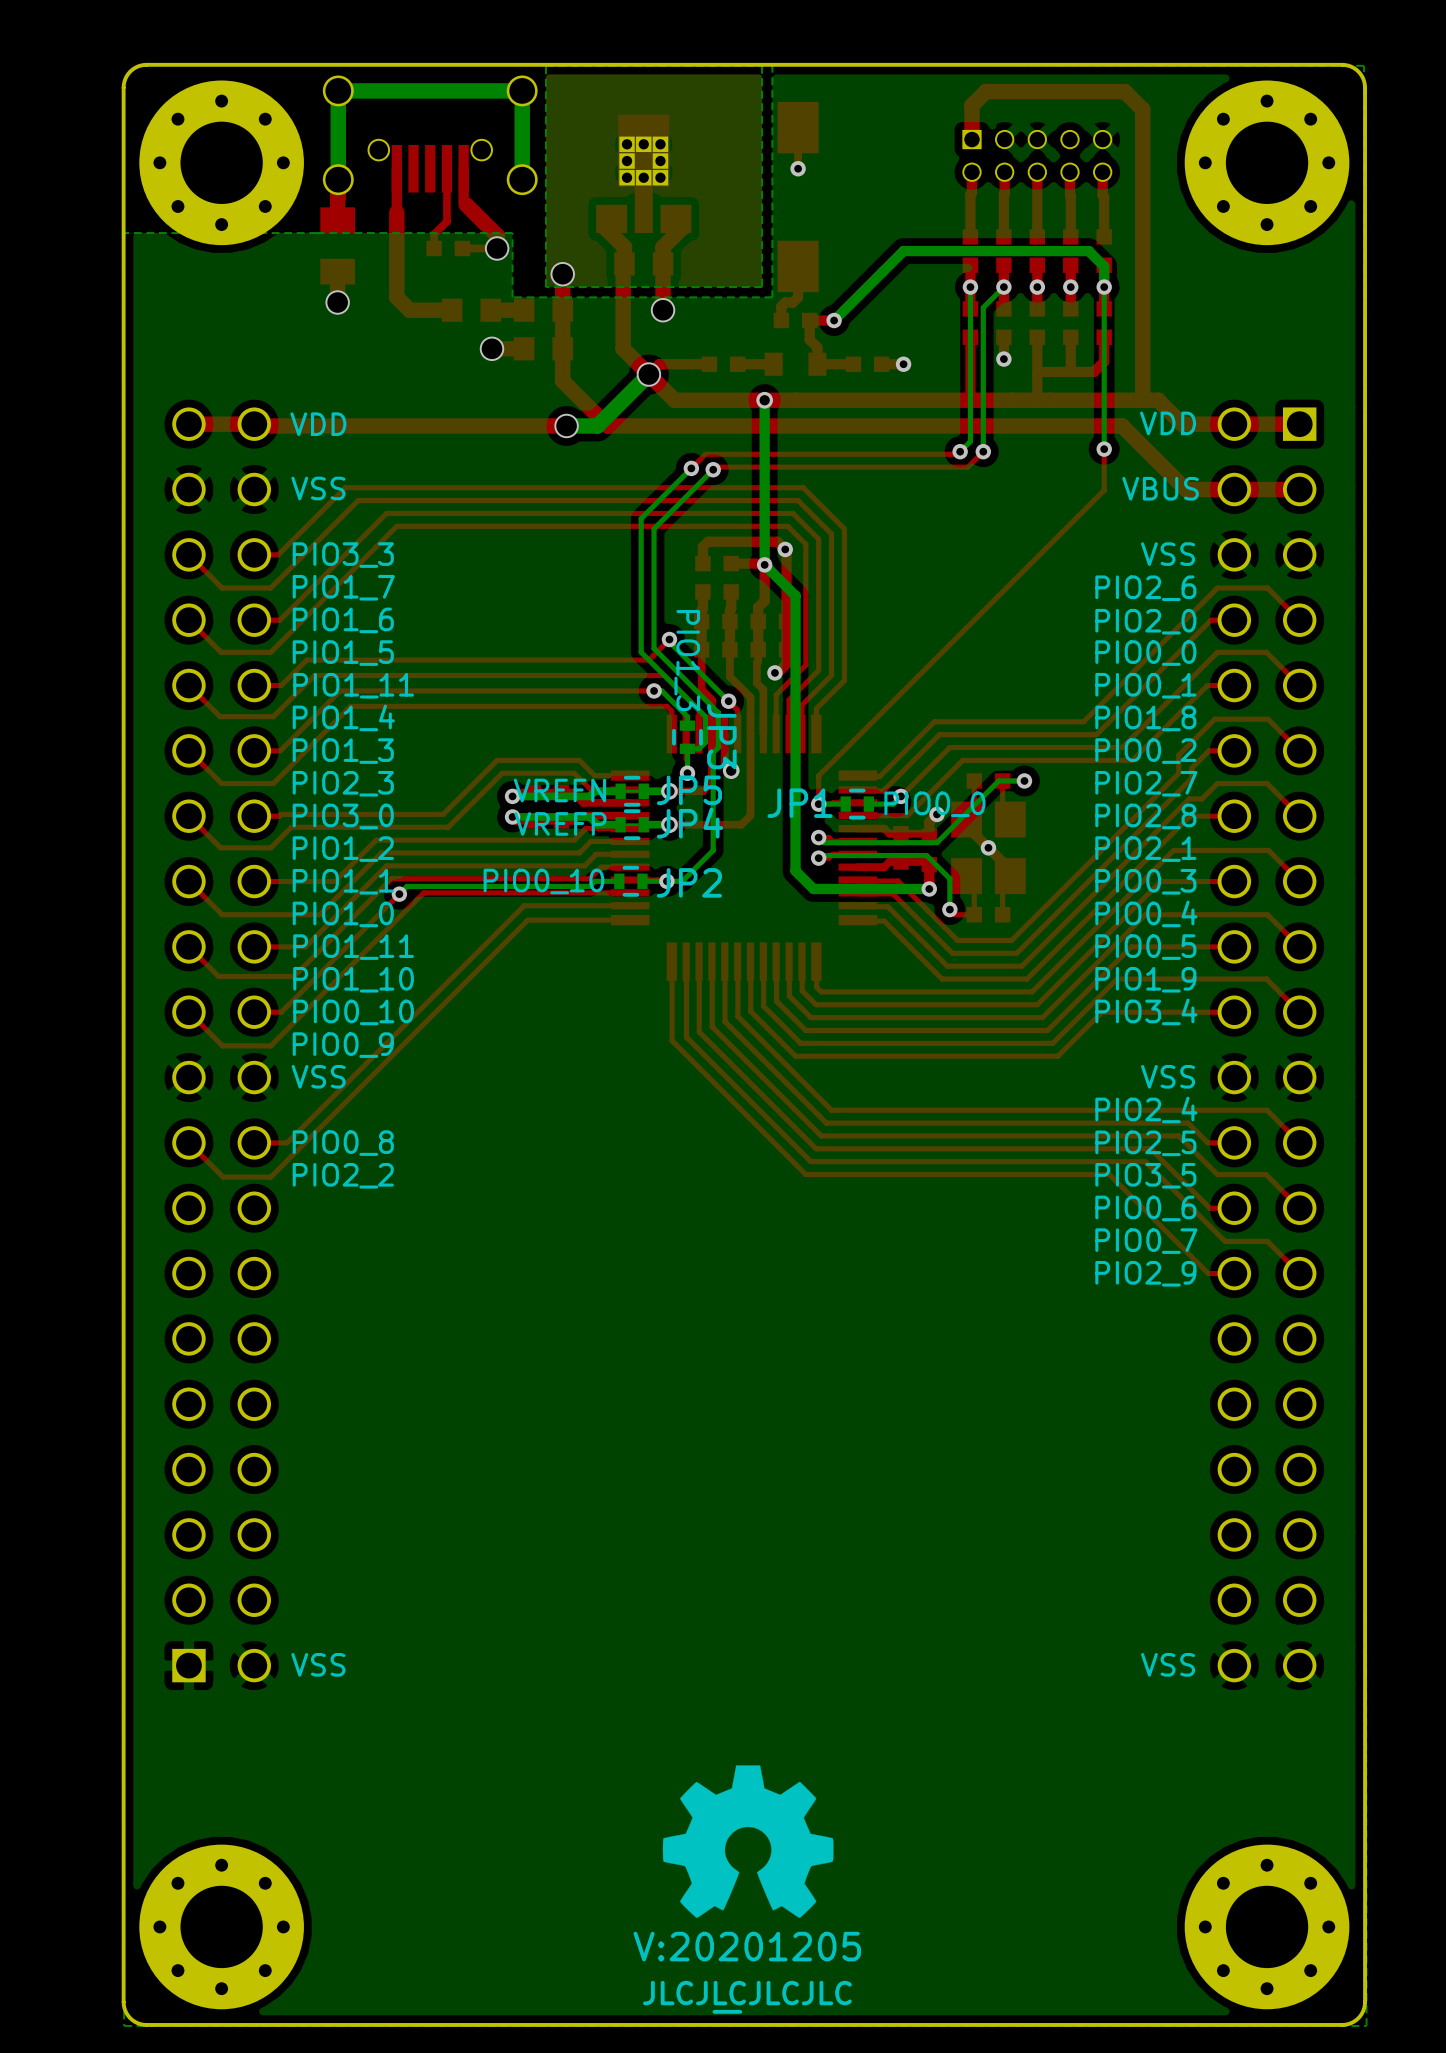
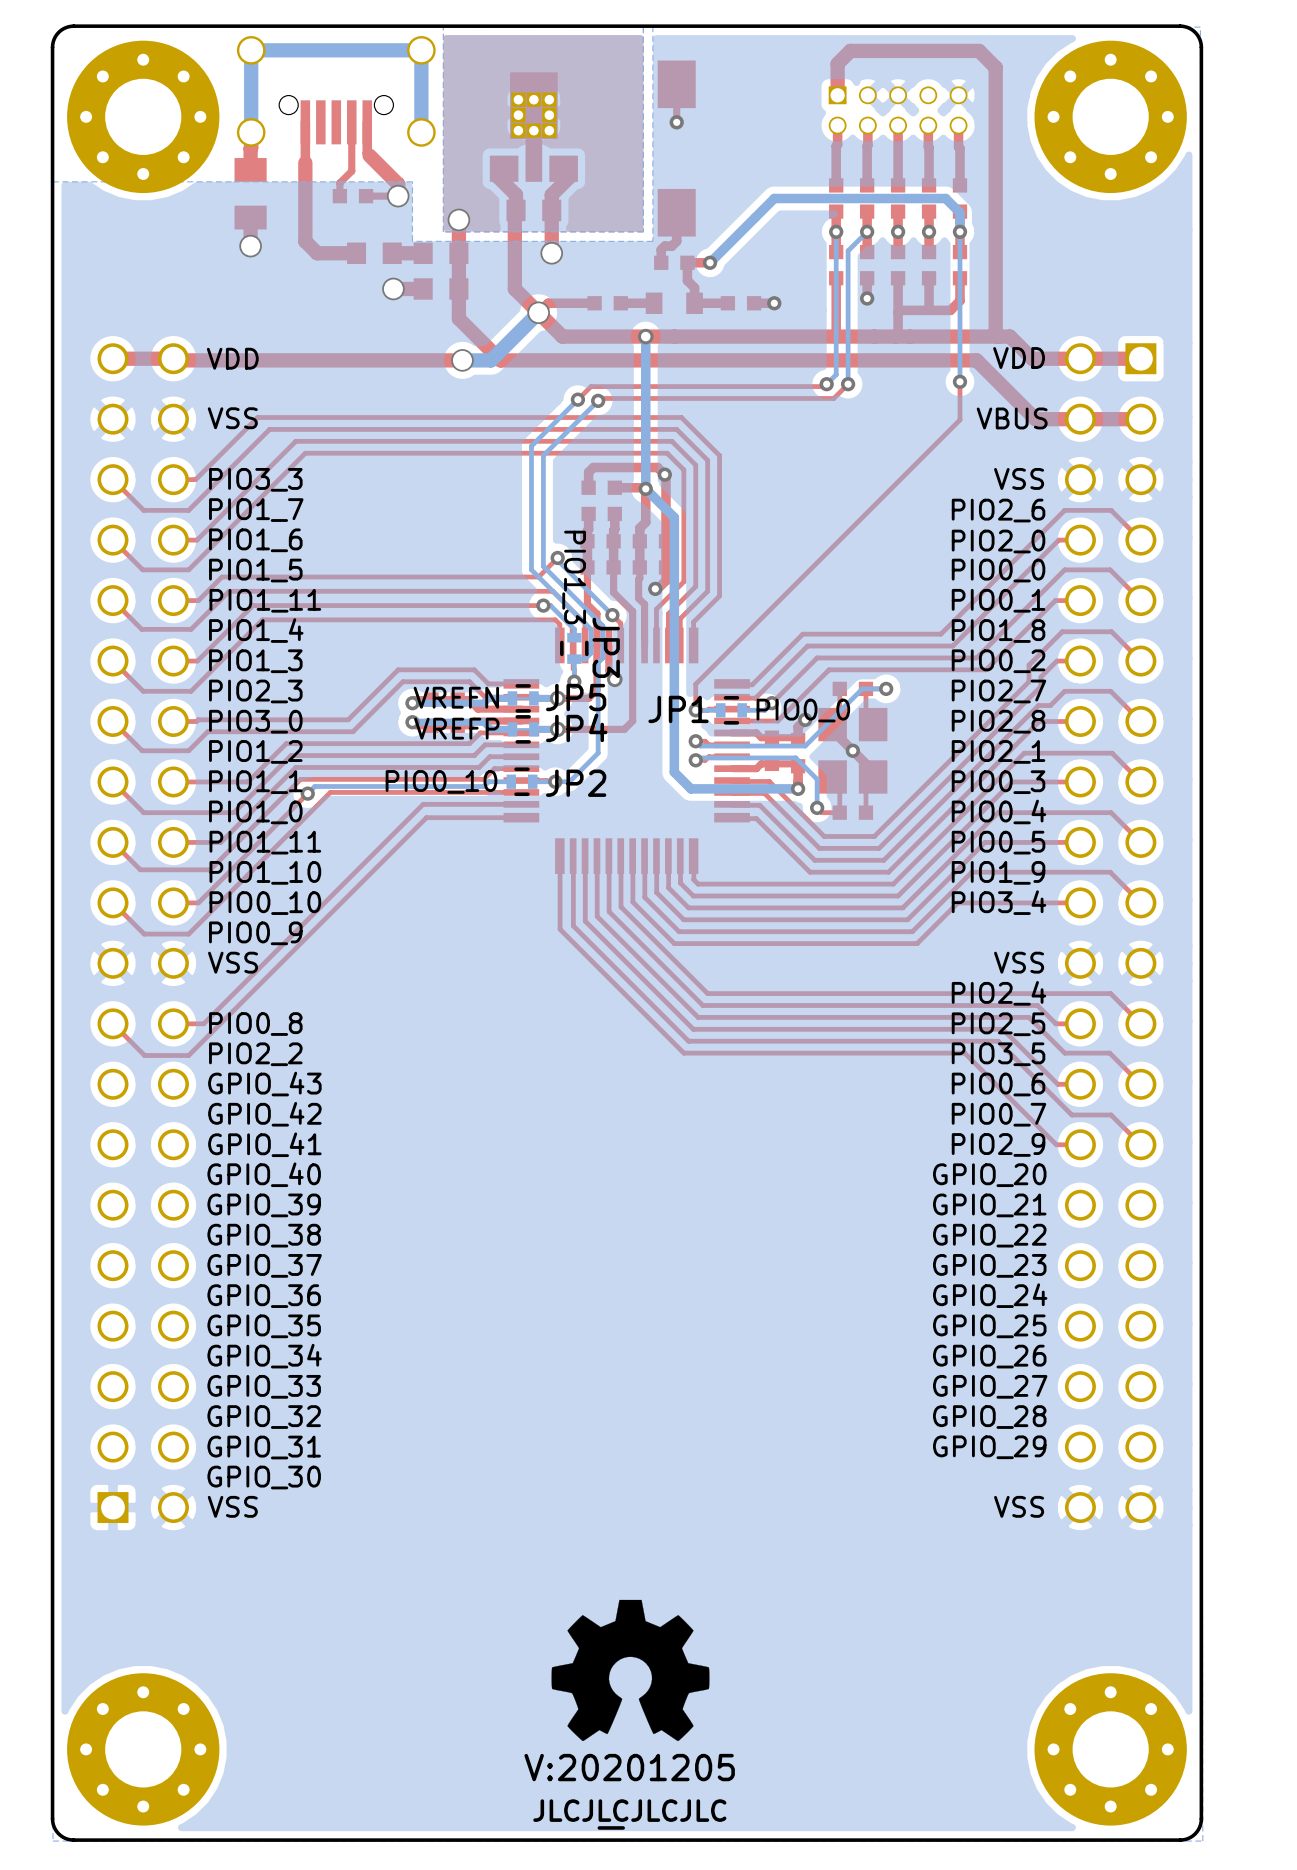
part footprint: [172, 407, 272, 1683] -> [97, 343, 189, 1524]
part footprint: [1217, 407, 1317, 1683] -> [1064, 343, 1157, 1524]

